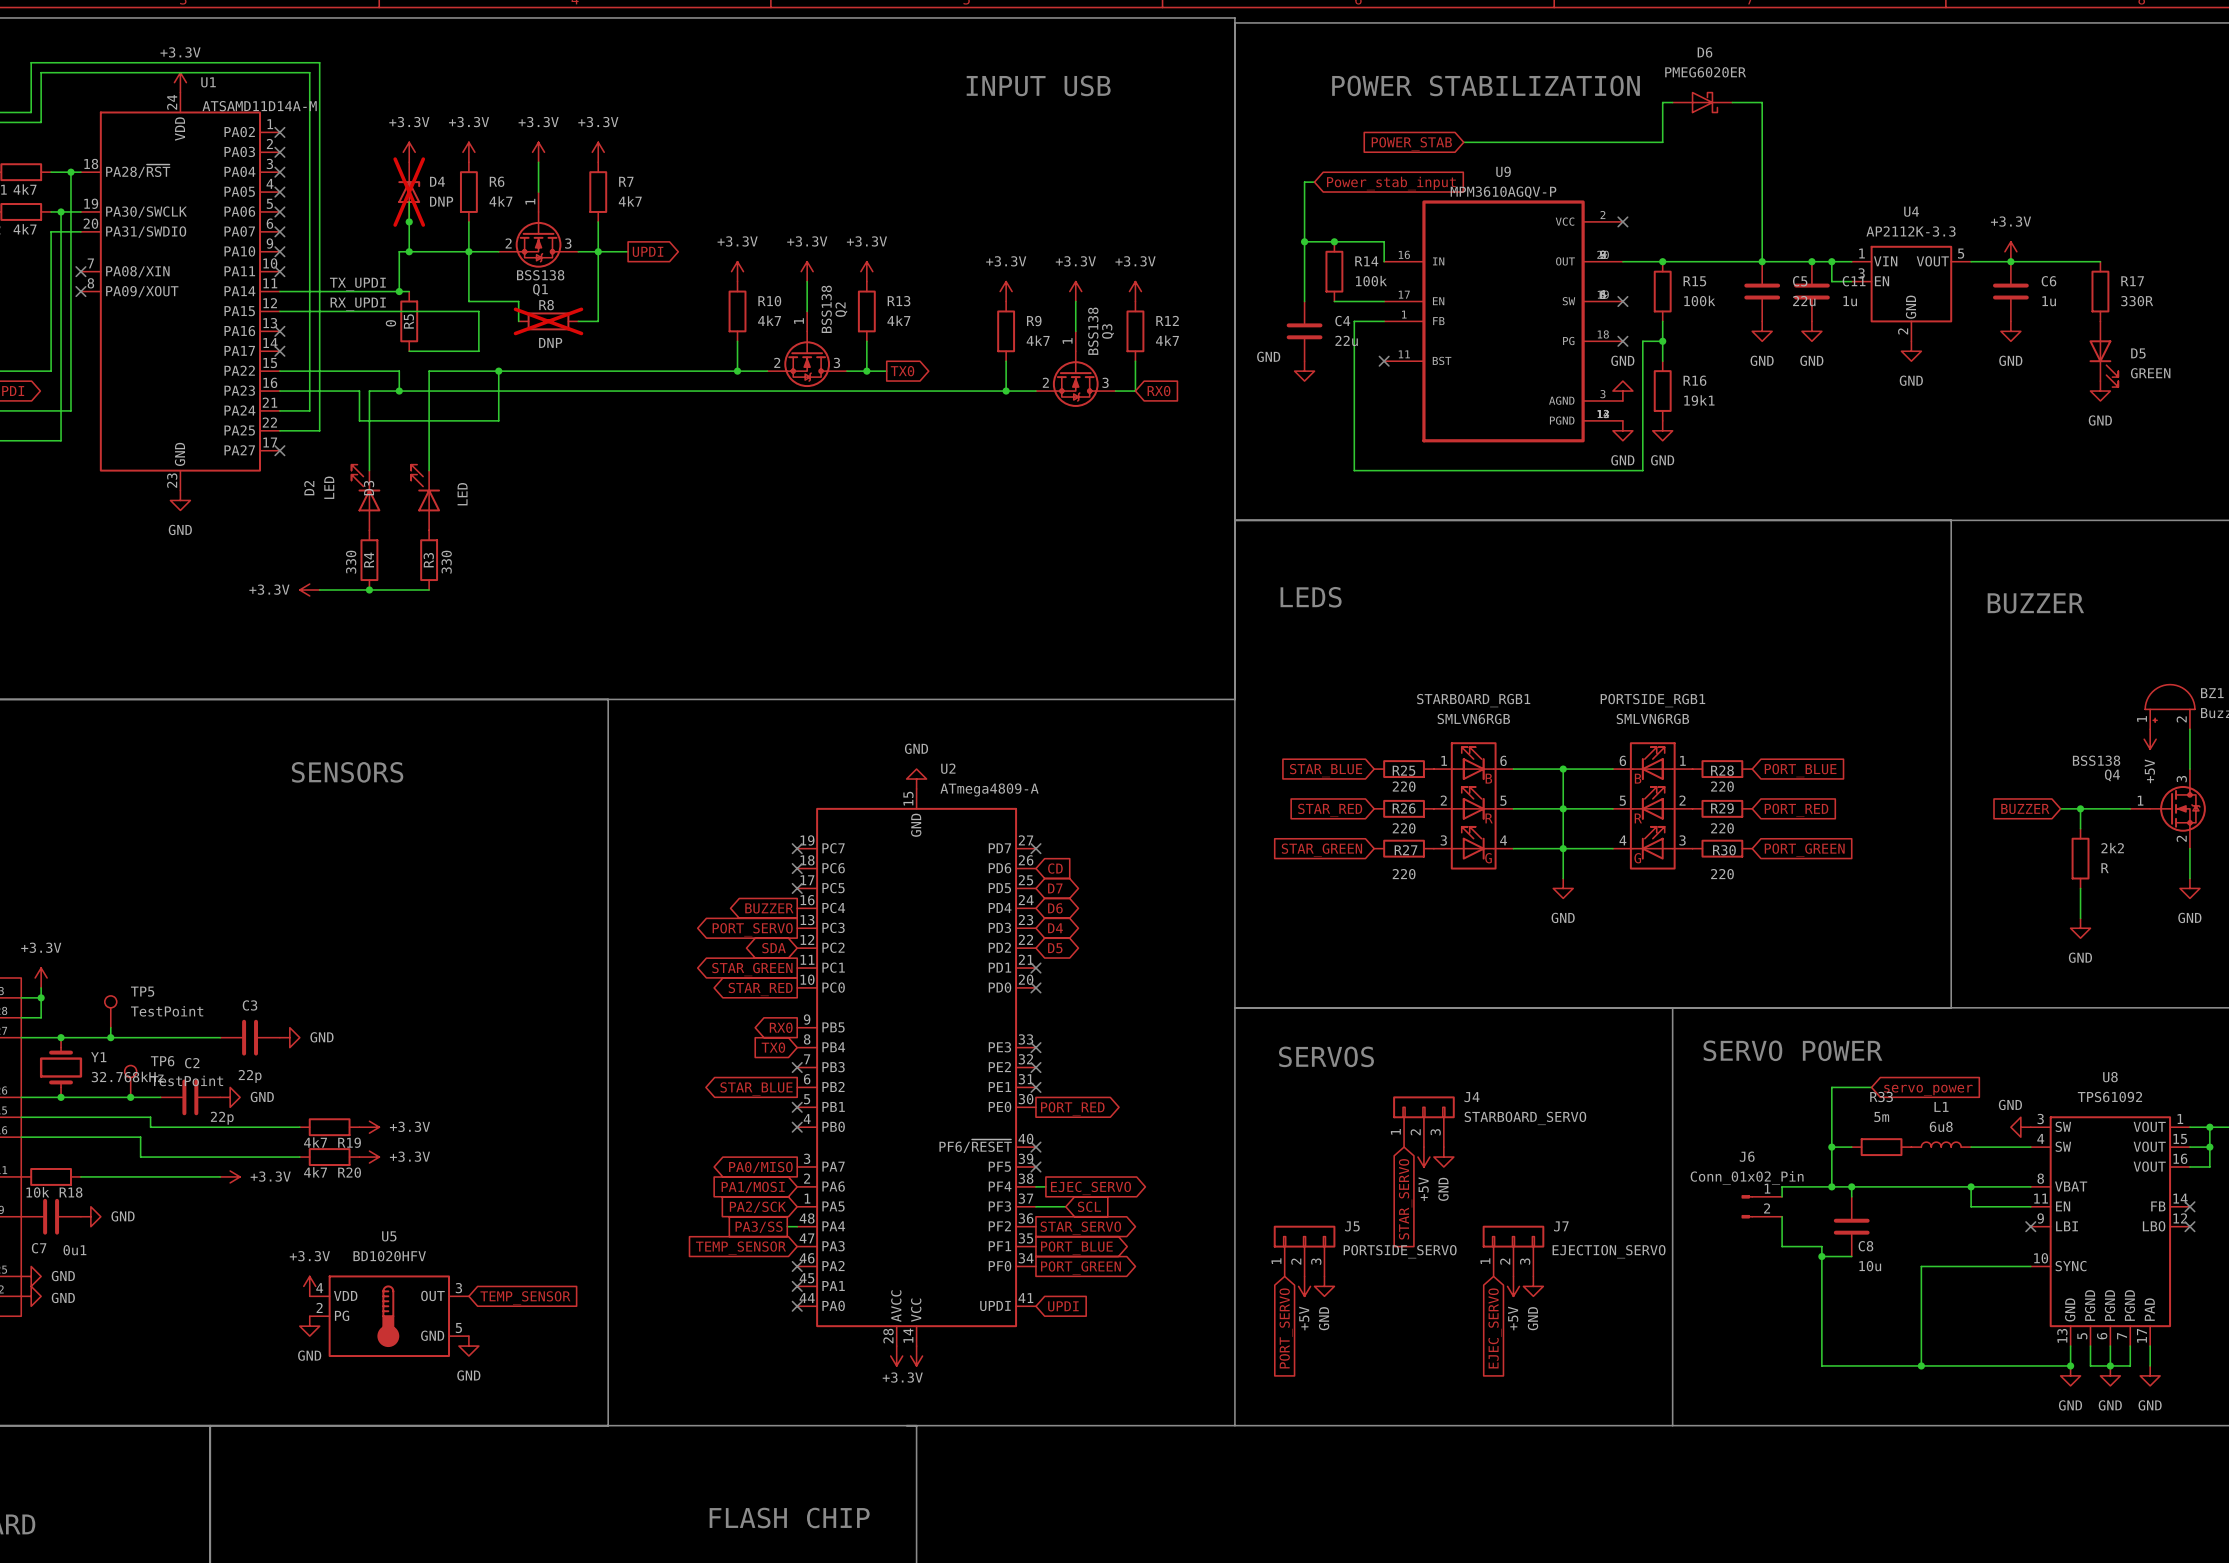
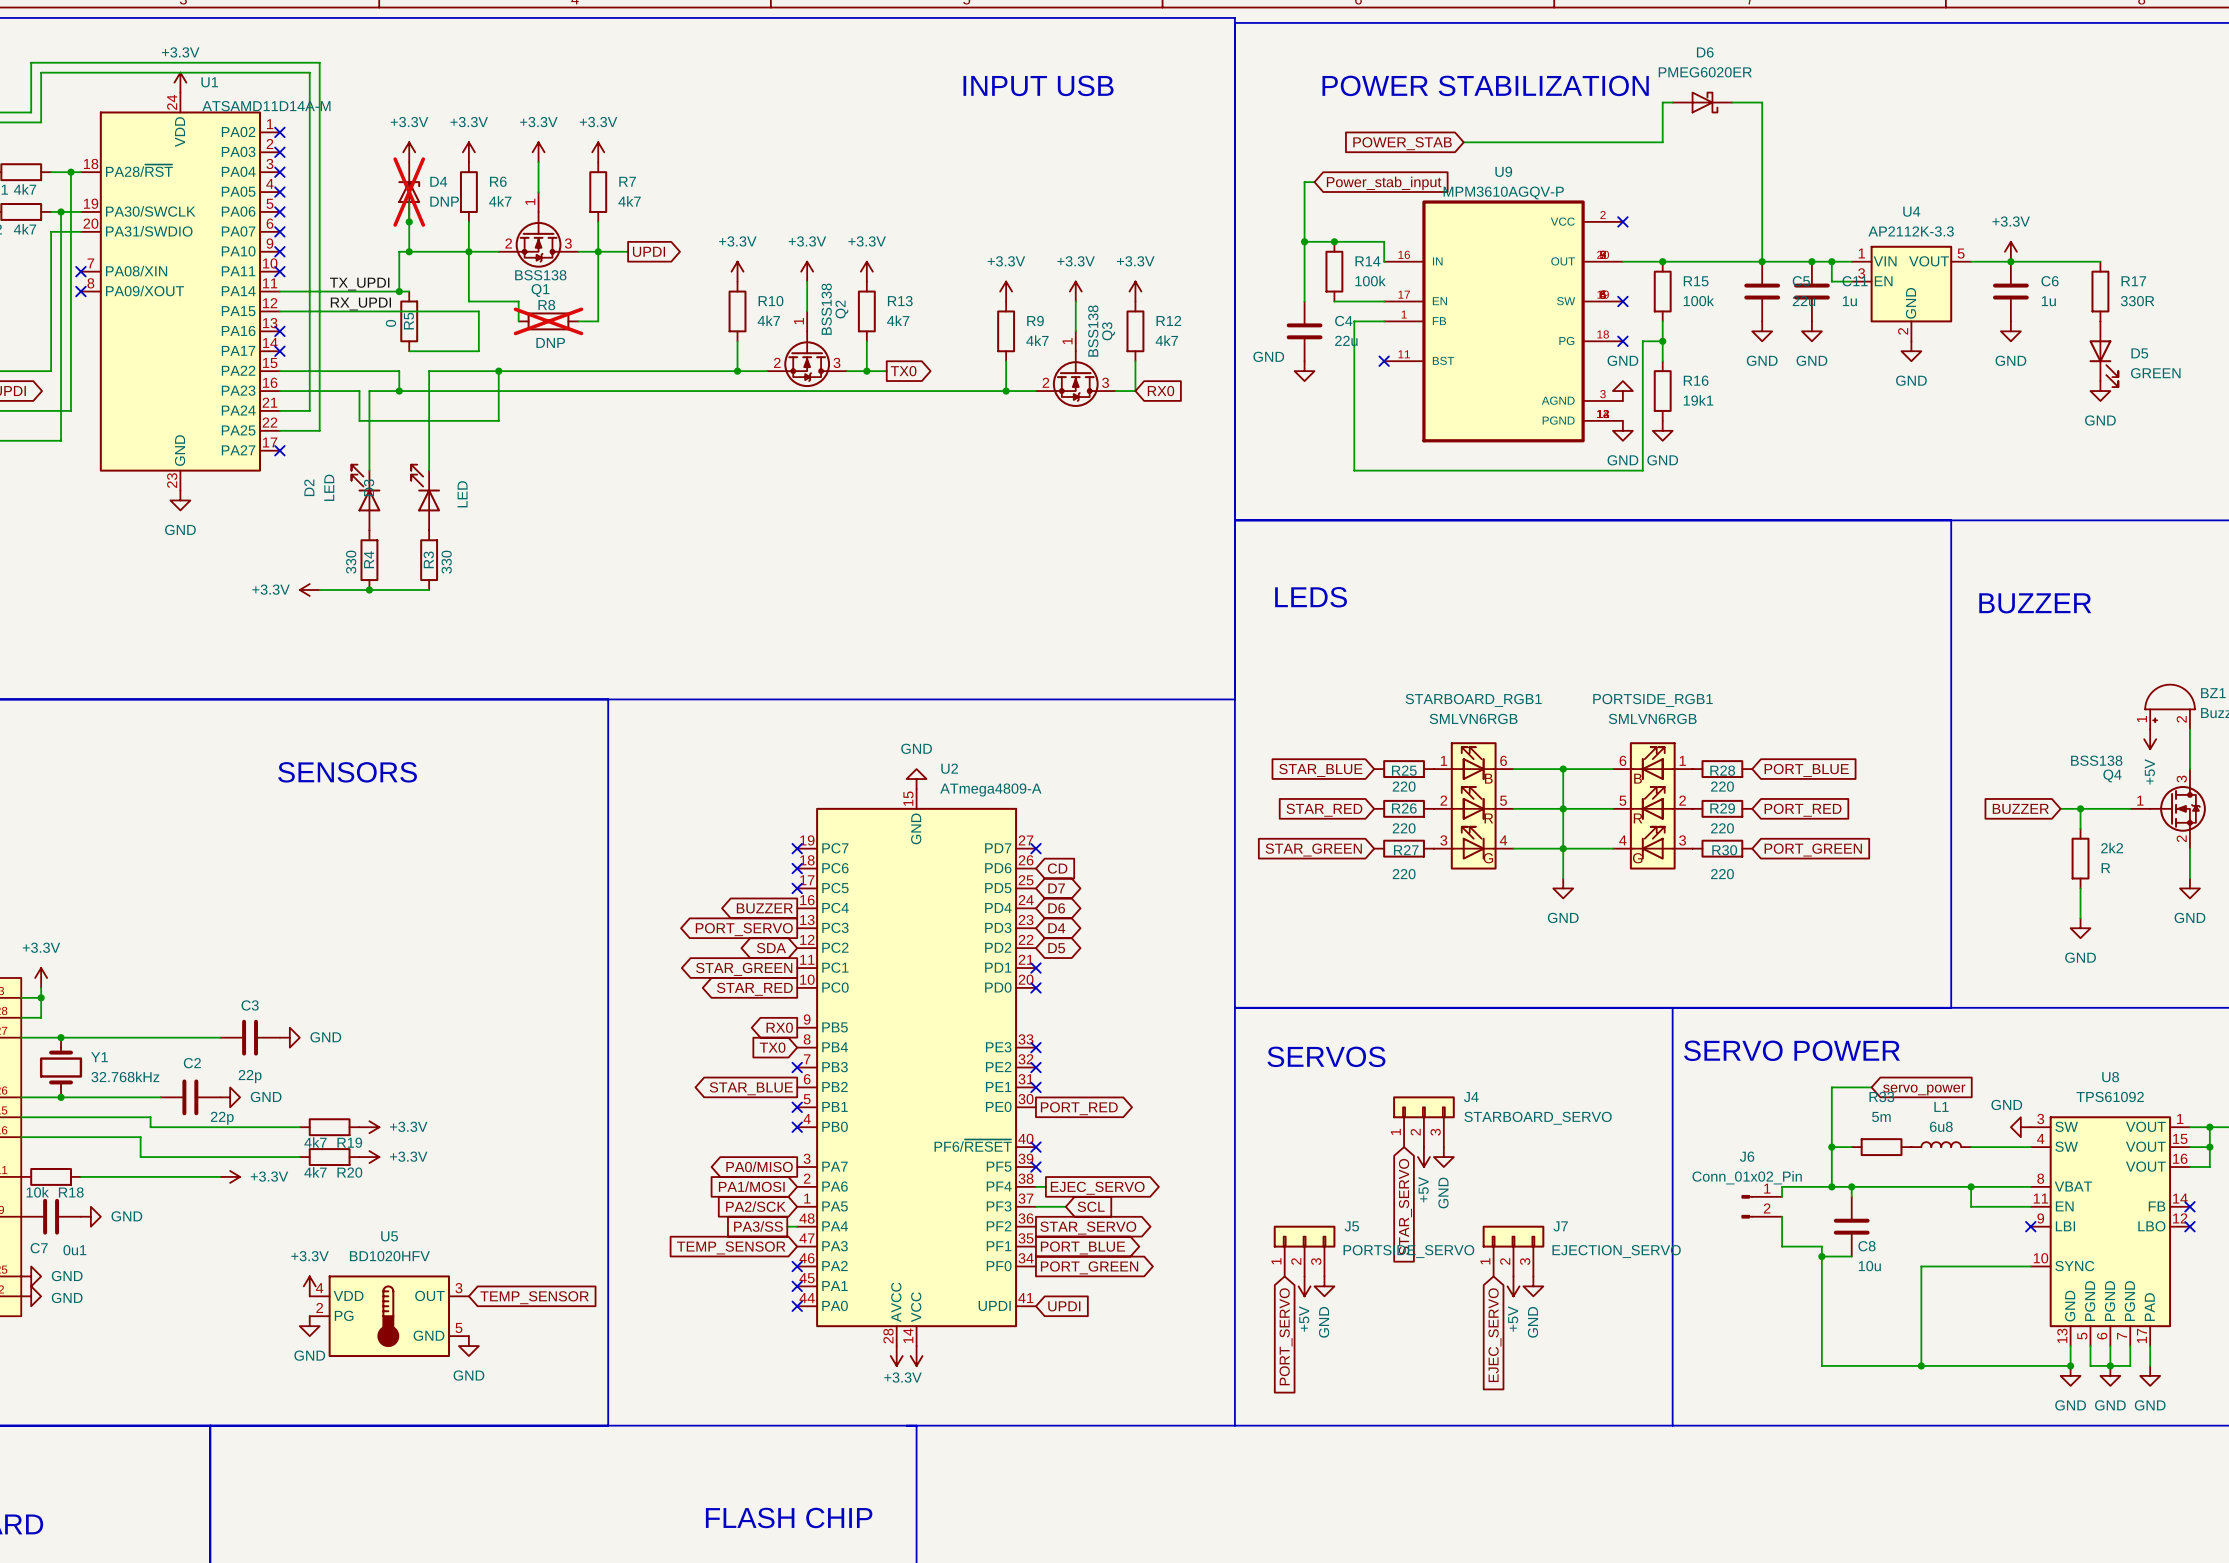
TP5: TestPoint (110, 1011) -> none
wire: (110, 1027) (110, 1037) -> none
junction: (110, 1037) -> none
TP6: TestPoint (130, 1081) -> none
junction: (130, 1097) -> none

